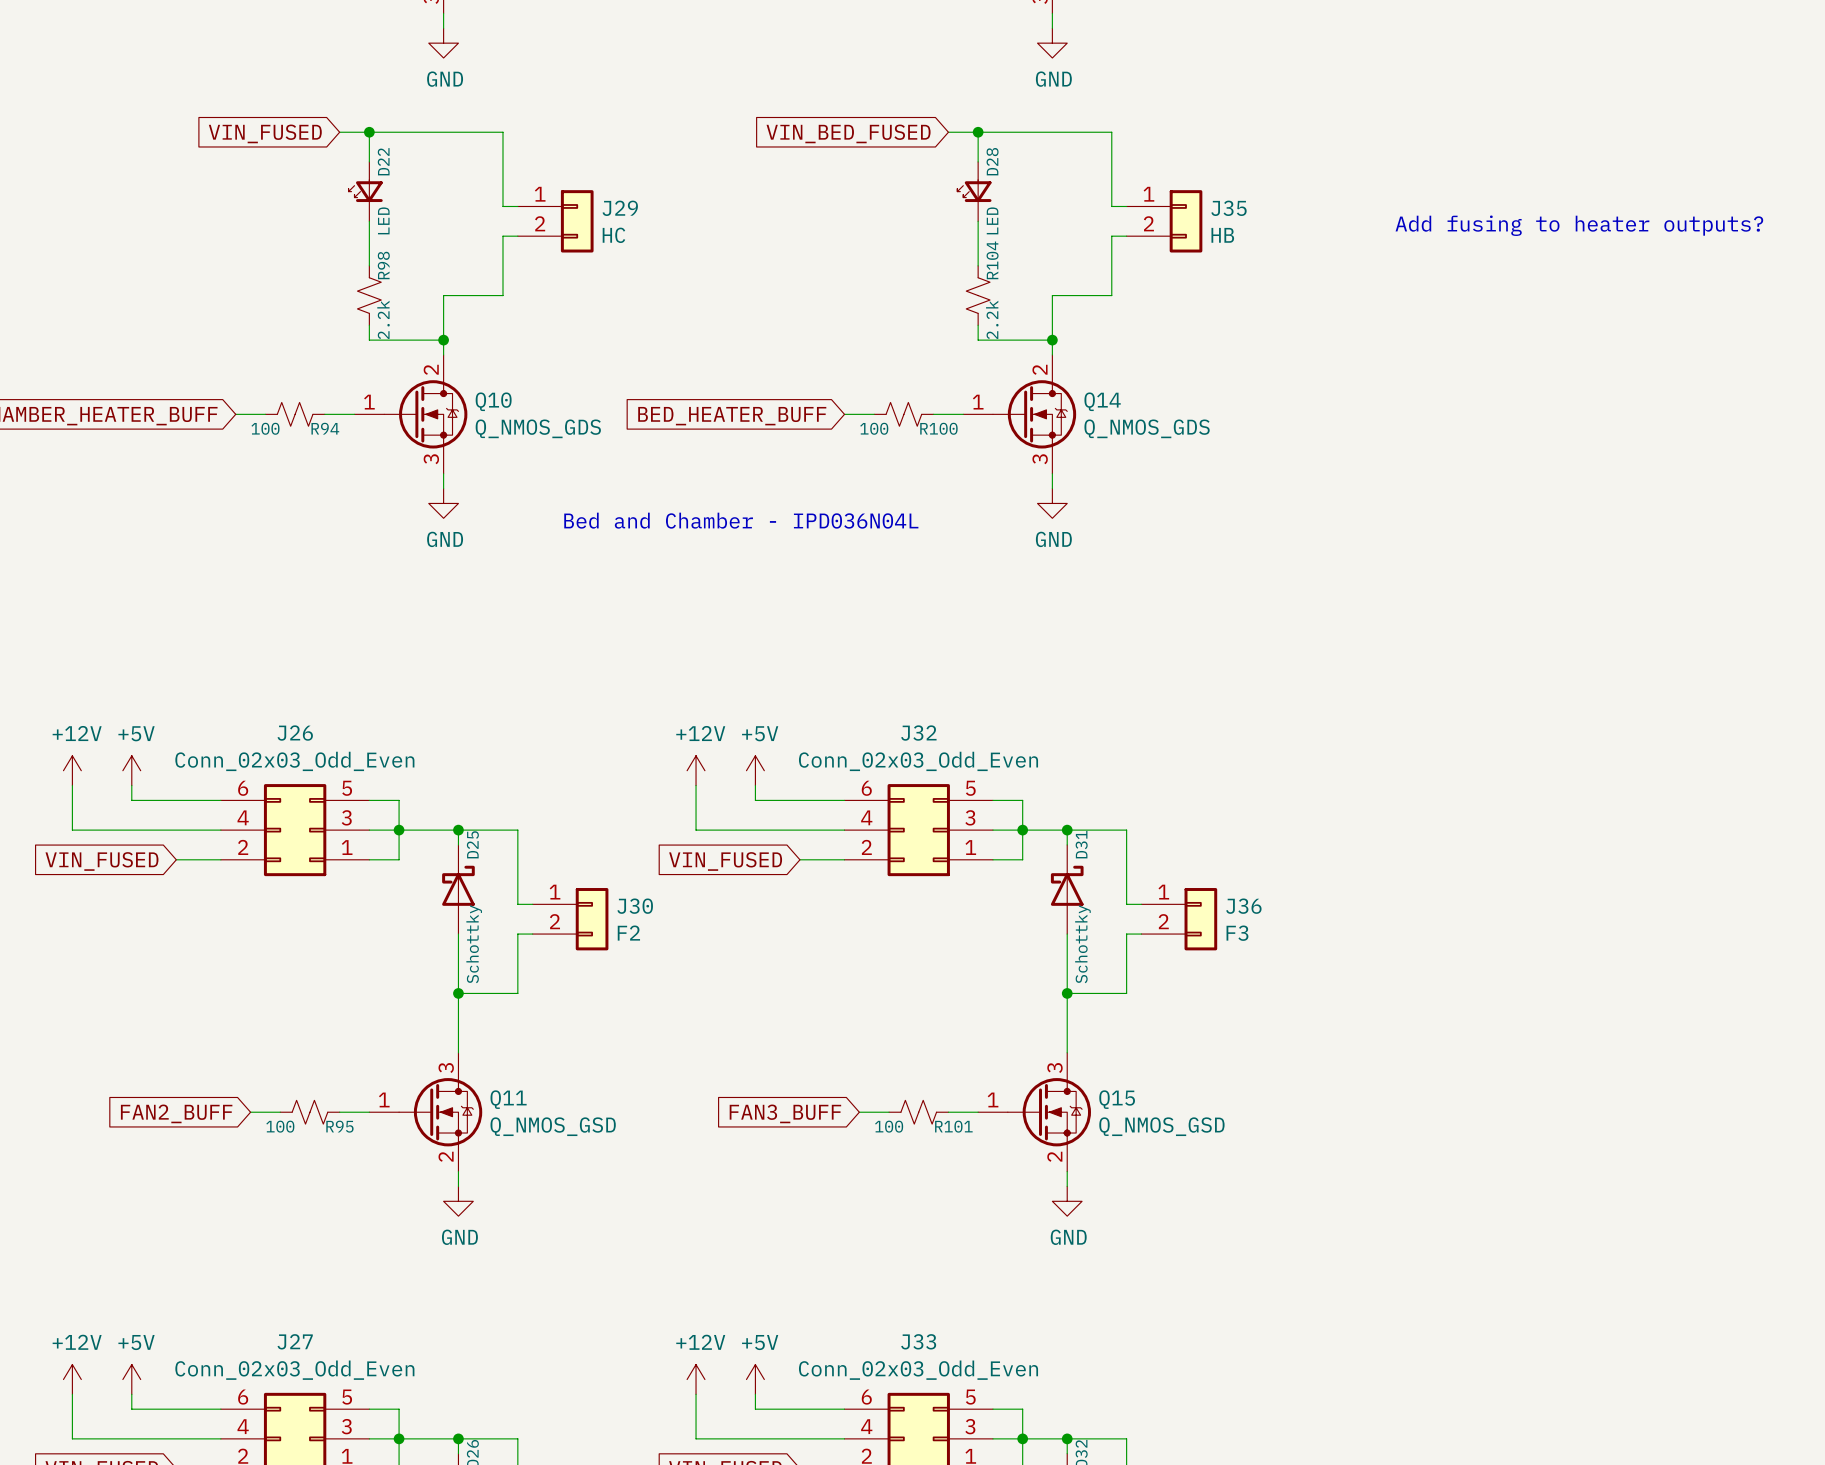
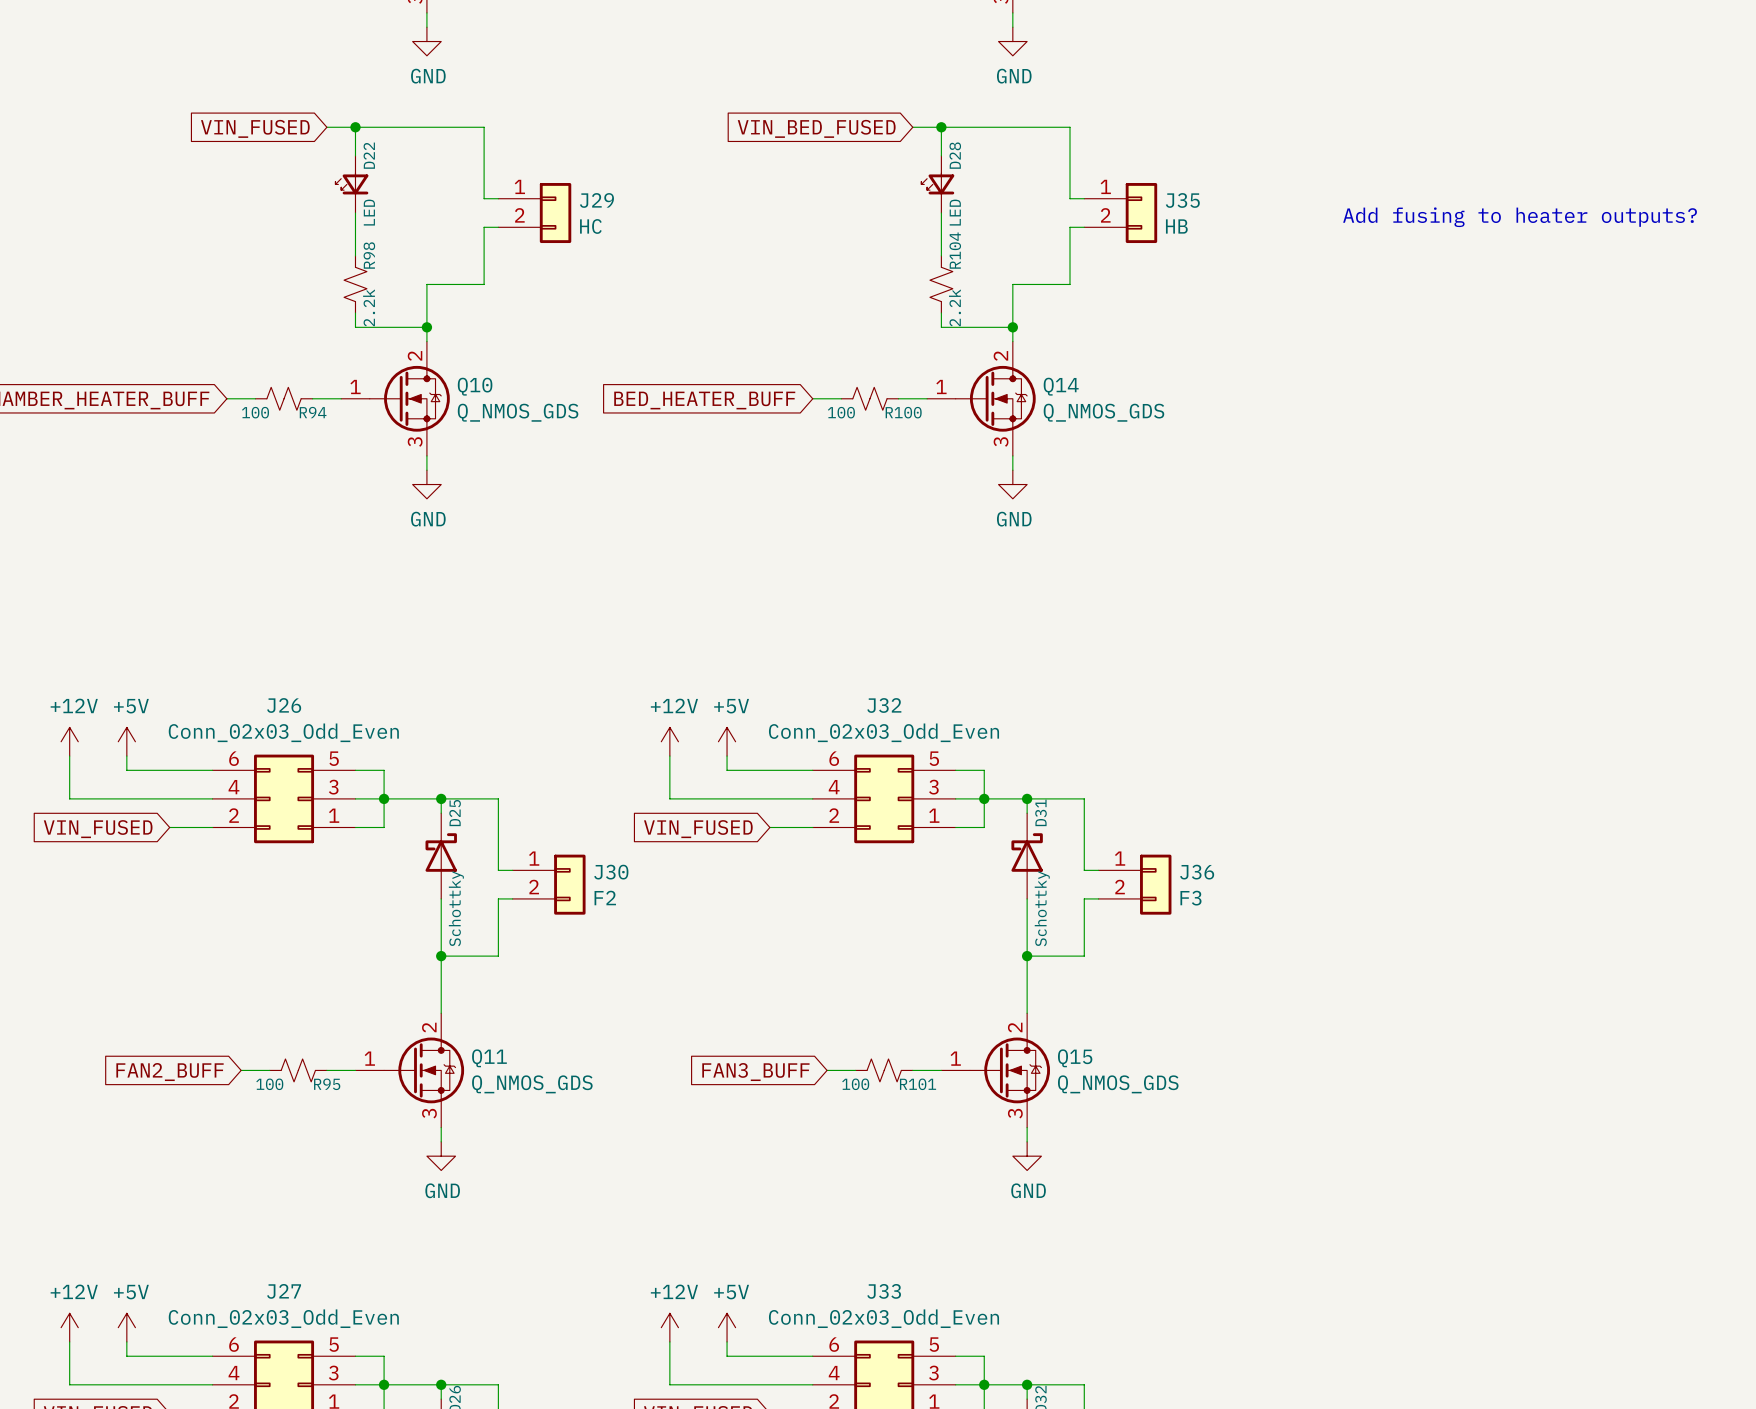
text: Bed and Chamber - IPD036N04L (741, 520) -> none
Q11 pin number: 3 (446, 1068) -> 2 (429, 1027)
Q15 pin number: 3 (1054, 1068) -> 2 (1015, 1027)
Q11 value: Q_NMOS_GSD (553, 1126) -> Q_NMOS_GDS (532, 1084)
Q15 value: Q_NMOS_GSD (1161, 1126) -> Q_NMOS_GDS (1118, 1084)
Q11 pin number: 2 (446, 1156) -> 3 (429, 1113)
Q15 pin number: 2 (1054, 1156) -> 3 (1015, 1113)

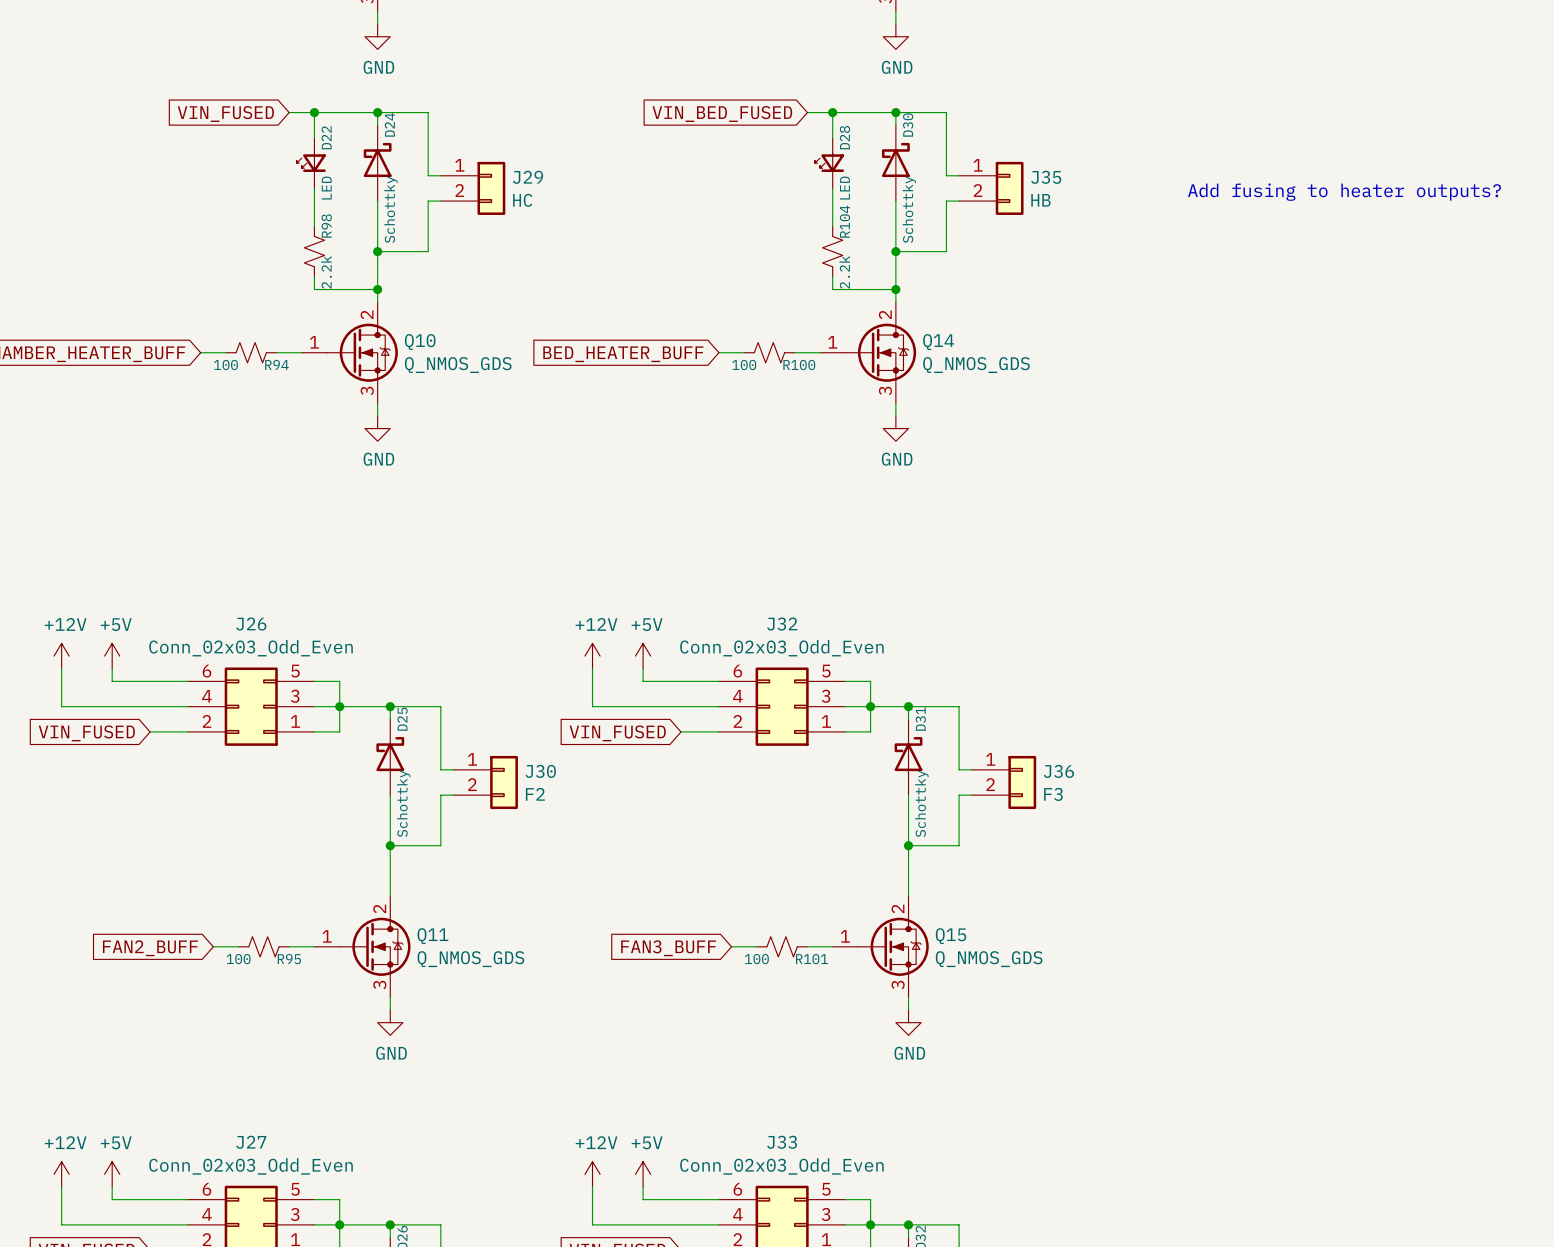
wire: none -> (377, 112) (377, 125)
junction: none -> (377, 112)
wire: none -> (895, 112) (895, 125)
junction: none -> (895, 112)
D24: none -> Schottky (377, 163)
D30: none -> Schottky (895, 163)
wire: none -> (377, 201) (377, 251)
wire: none -> (895, 201) (895, 251)
junction: none -> (377, 251)
junction: none -> (895, 251)

